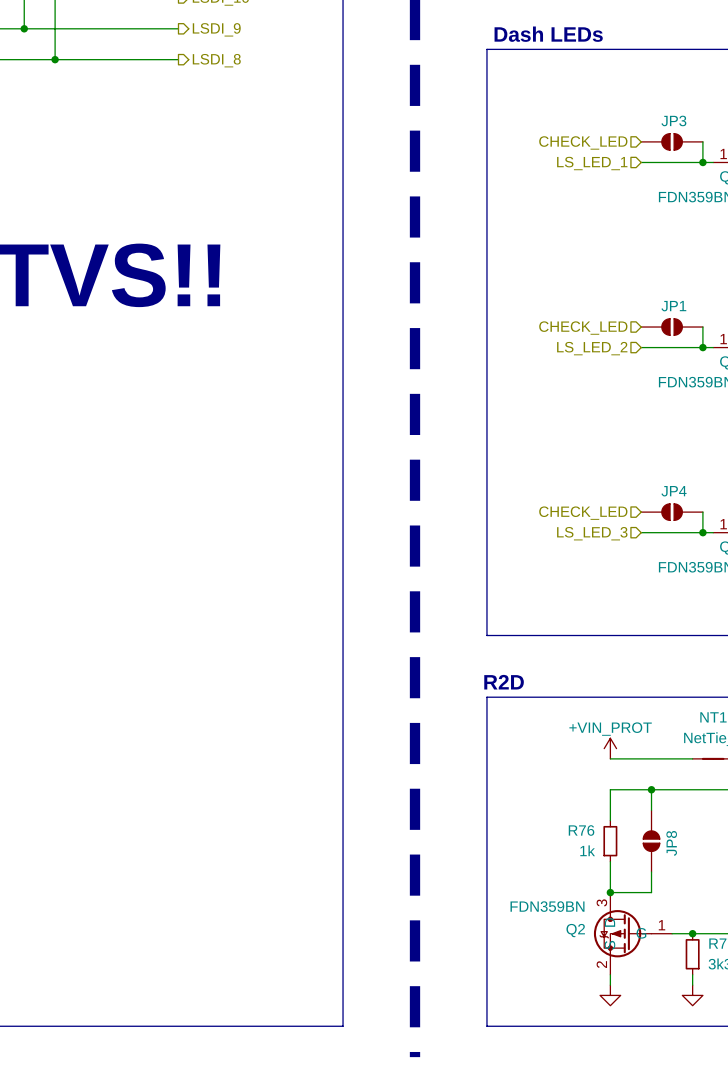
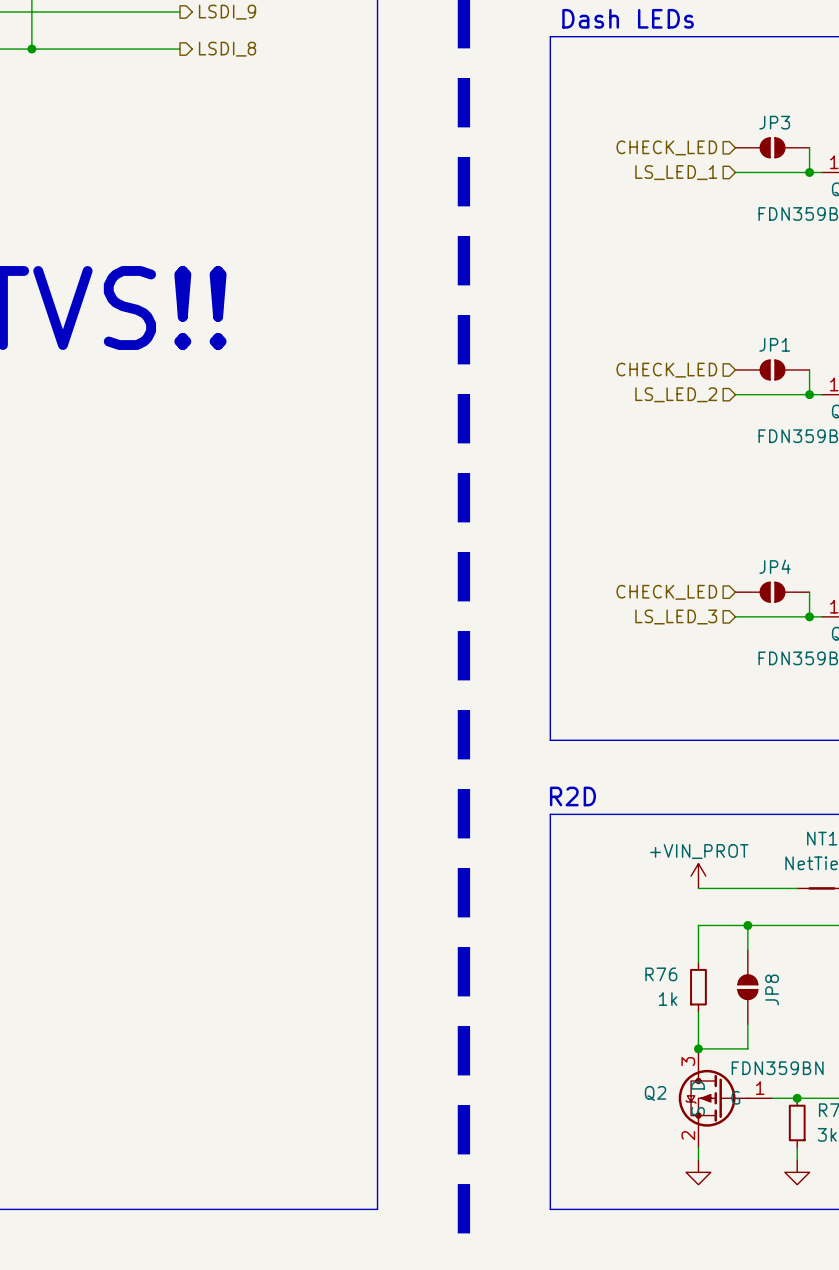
Q2 value position: FDN359BN (547, 906) -> FDN359BN (777, 1068)

